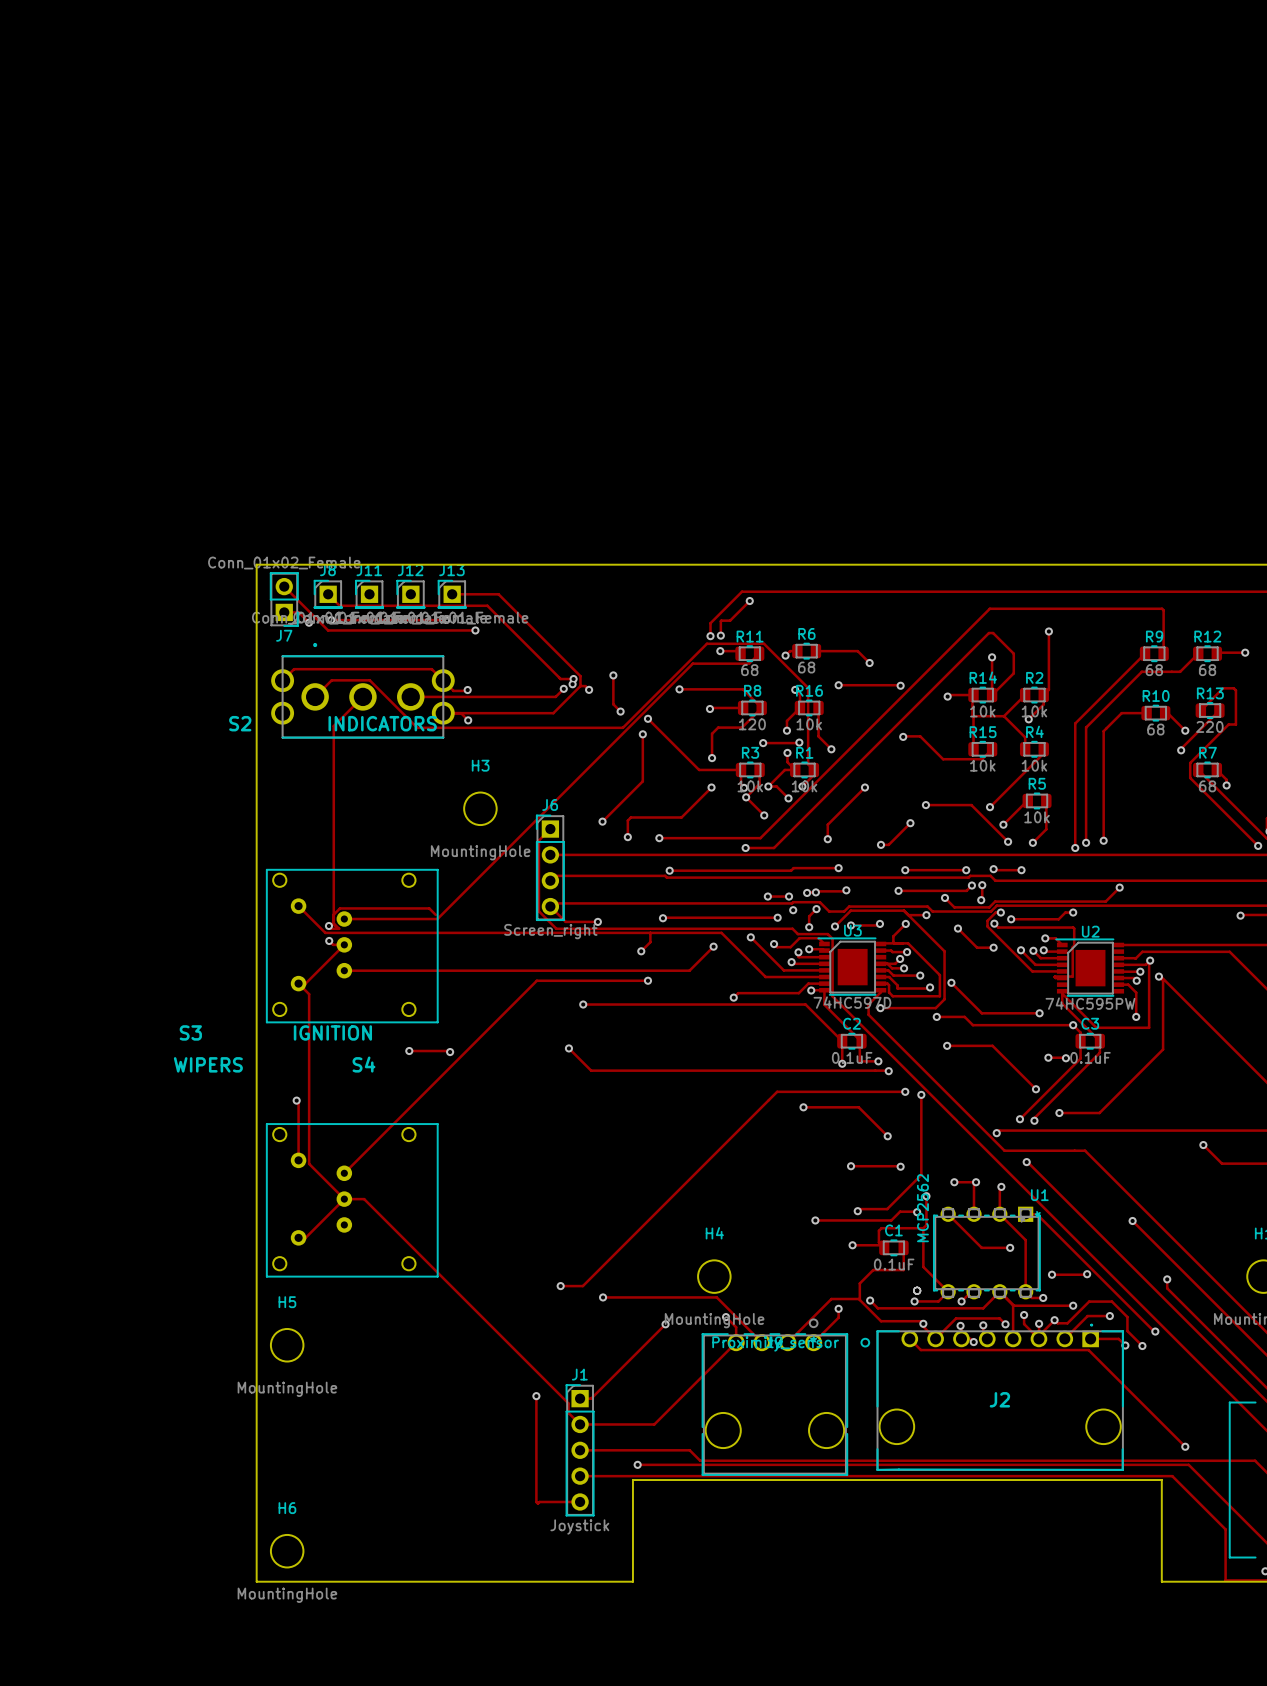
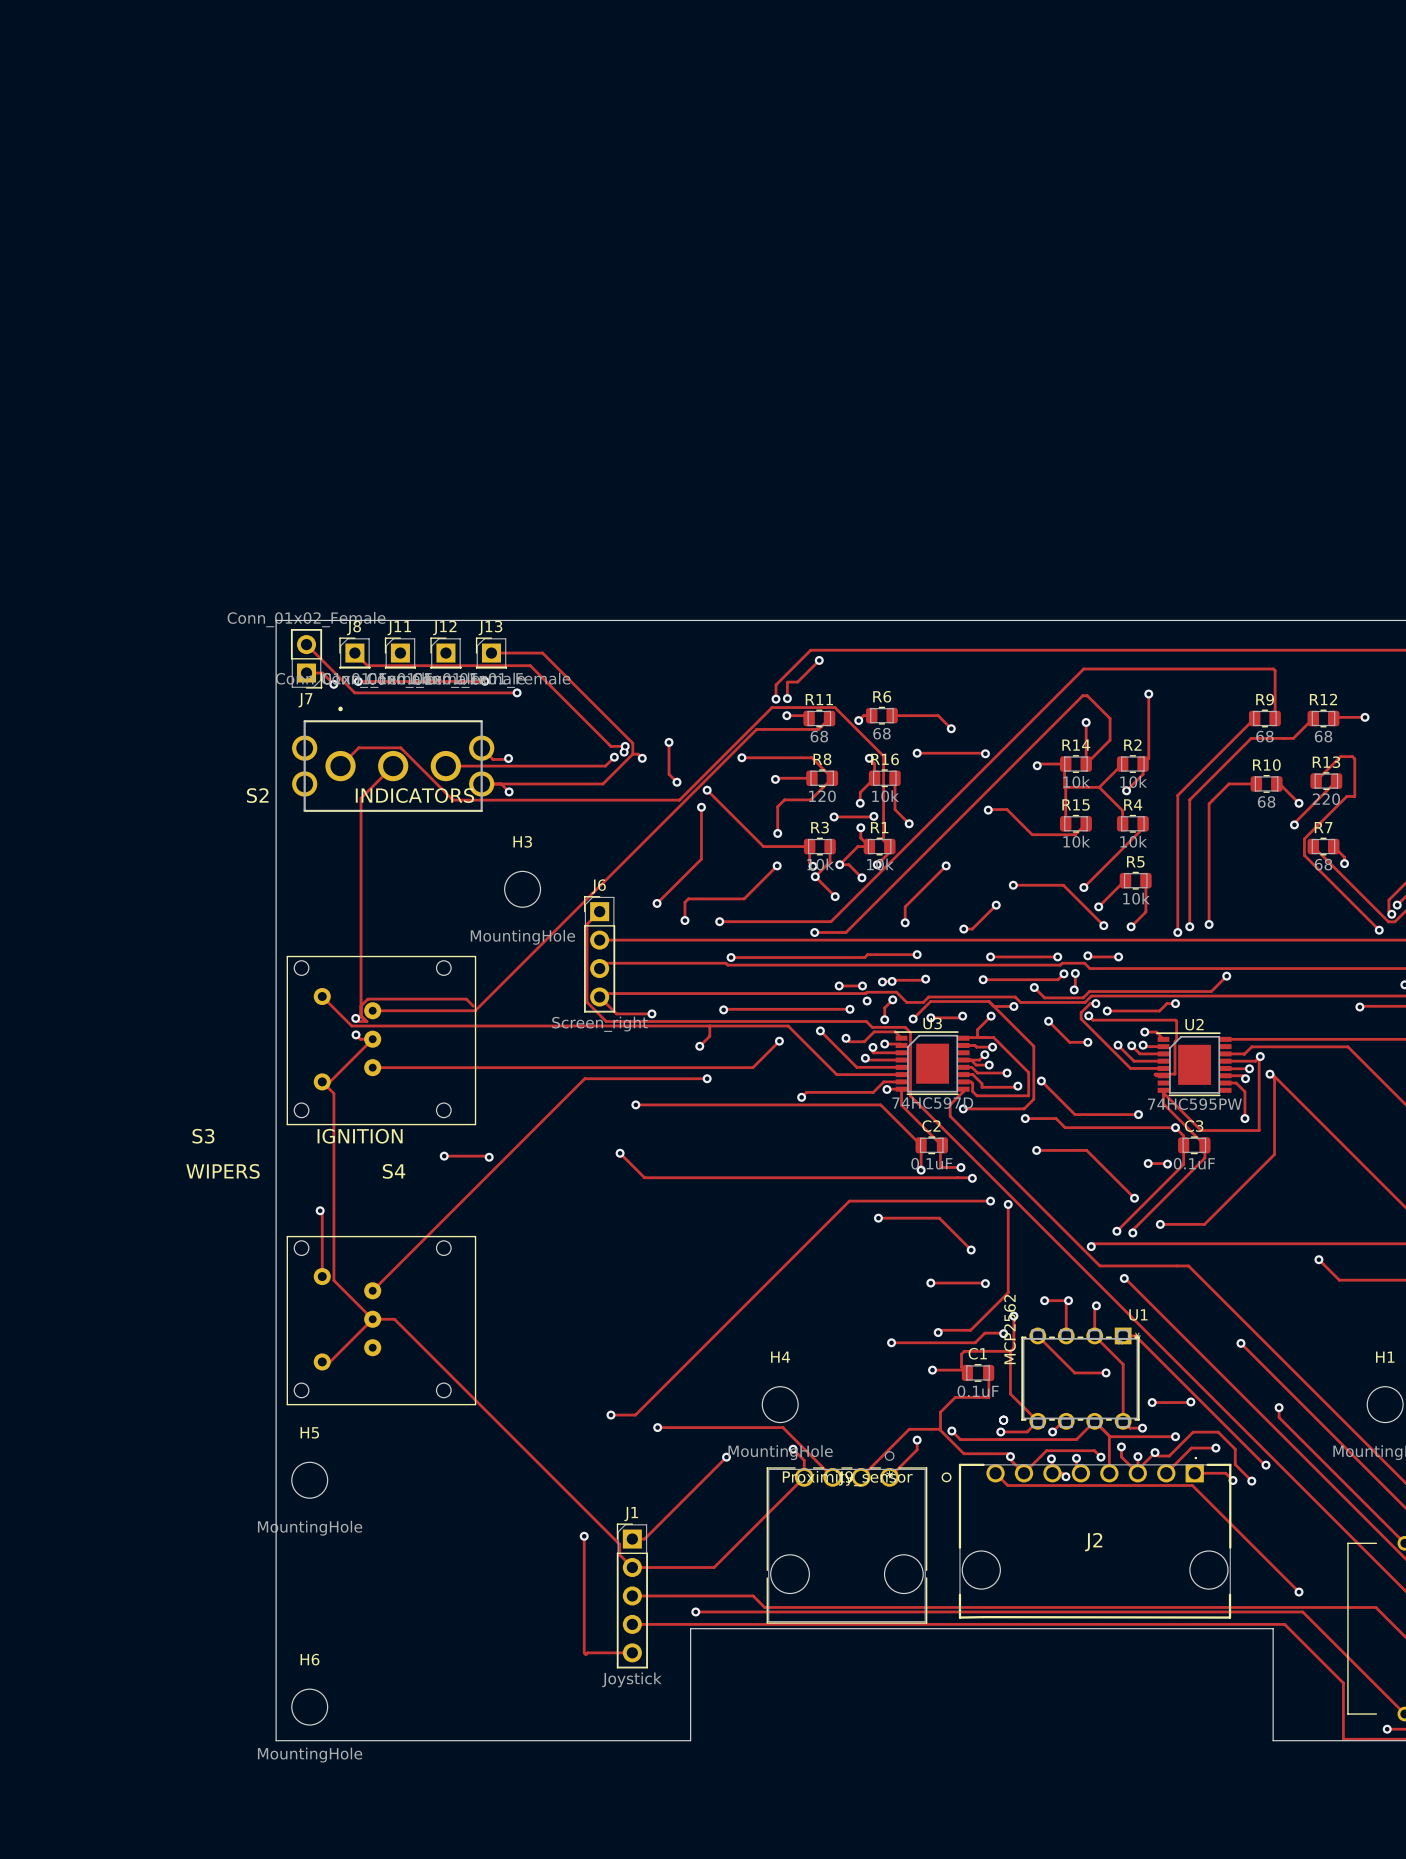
track: (282, 680) (294, 669) (431, 669) (443, 680) -> none

